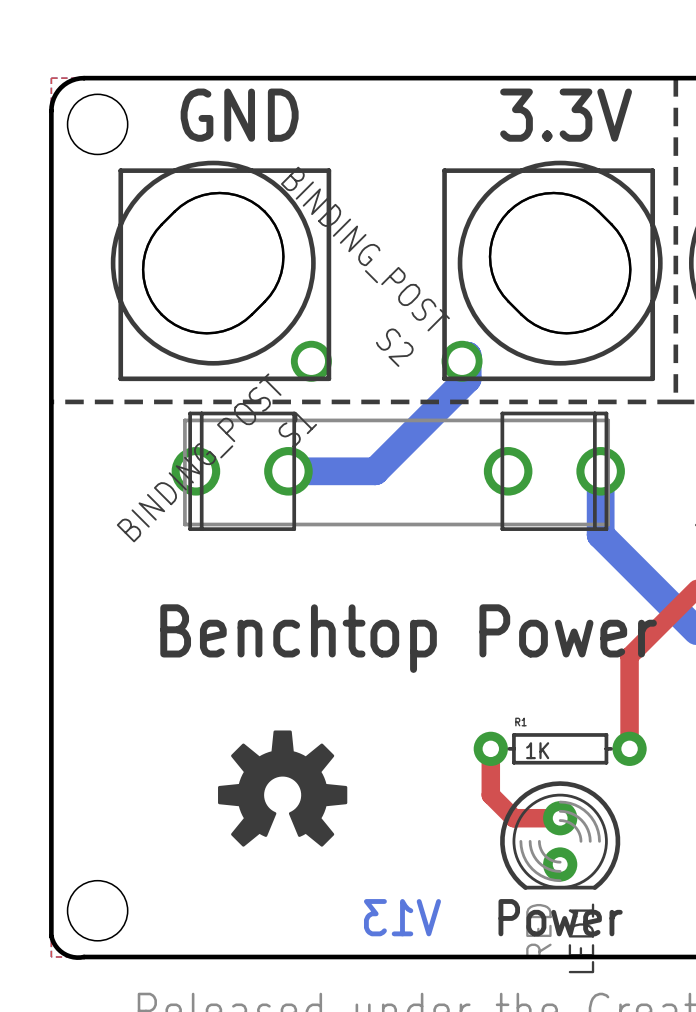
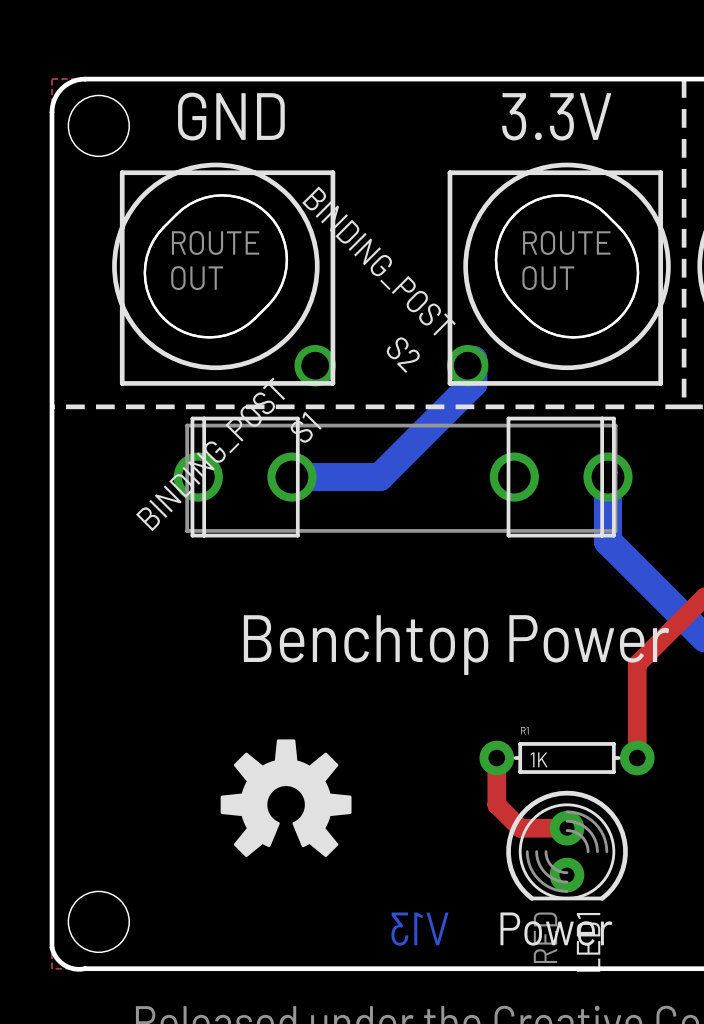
text: none -> ROUTE (215, 242)
text: none -> ROUTE (566, 242)
text: none -> OUT (197, 278)
text: none -> OUT (548, 278)

